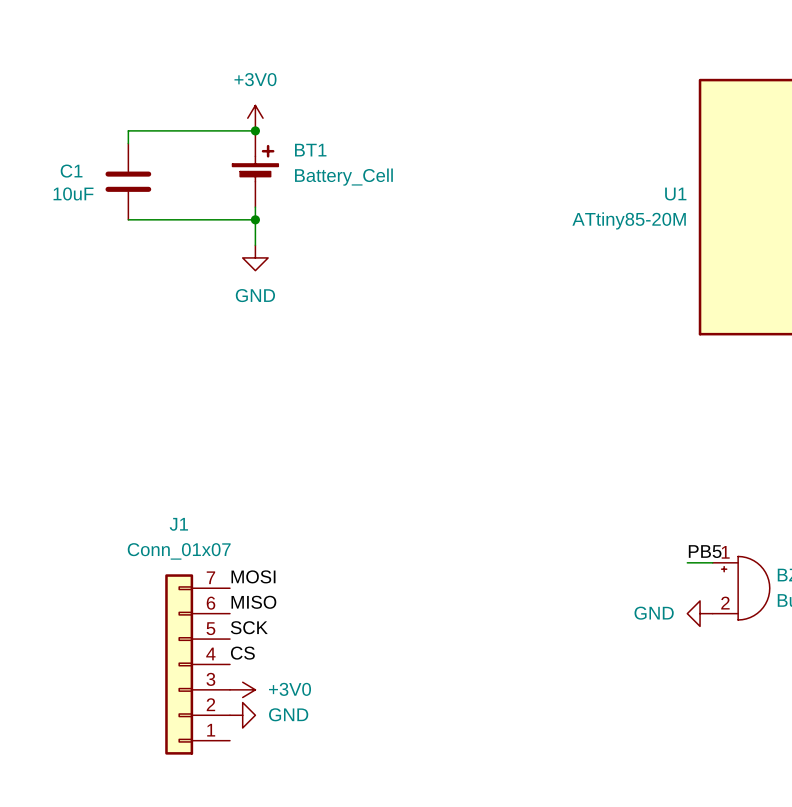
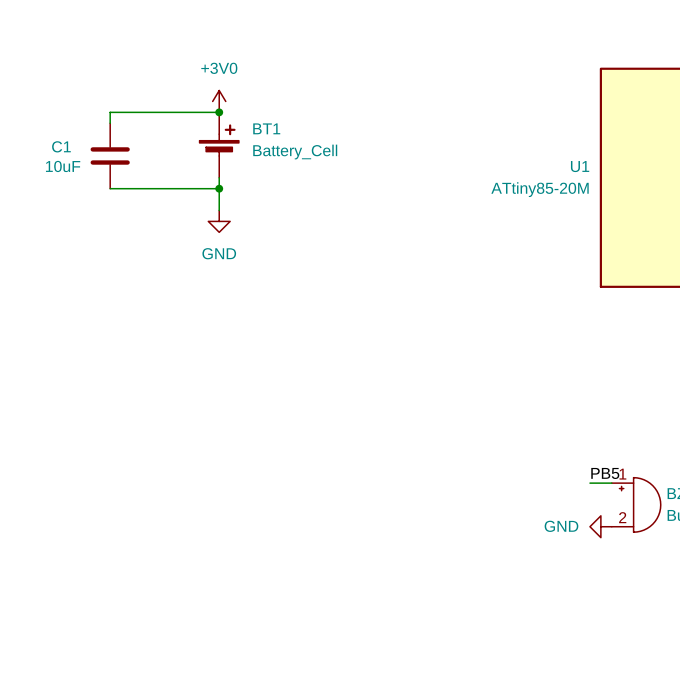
label: MOSI (253, 576) -> none
label: MISO (253, 602) -> none
label: SCK (249, 627) -> none
label: CS (242, 653) -> none
J1: Conn_01x07 (197, 664) -> none
power symbol: +3V0 (242, 689) -> none
power symbol: GND (242, 715) -> none

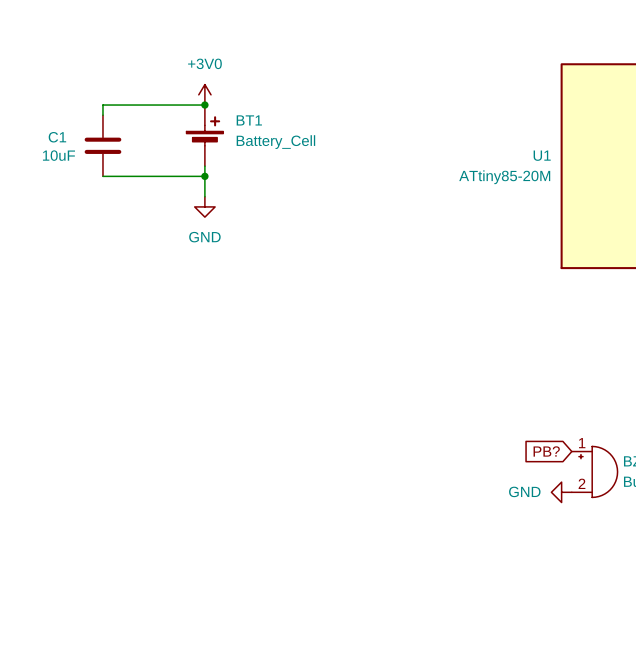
label: PB5 (605, 473) -> none
global label: none -> PB? (546, 451)
wire: (589, 483) (611, 483) -> none

